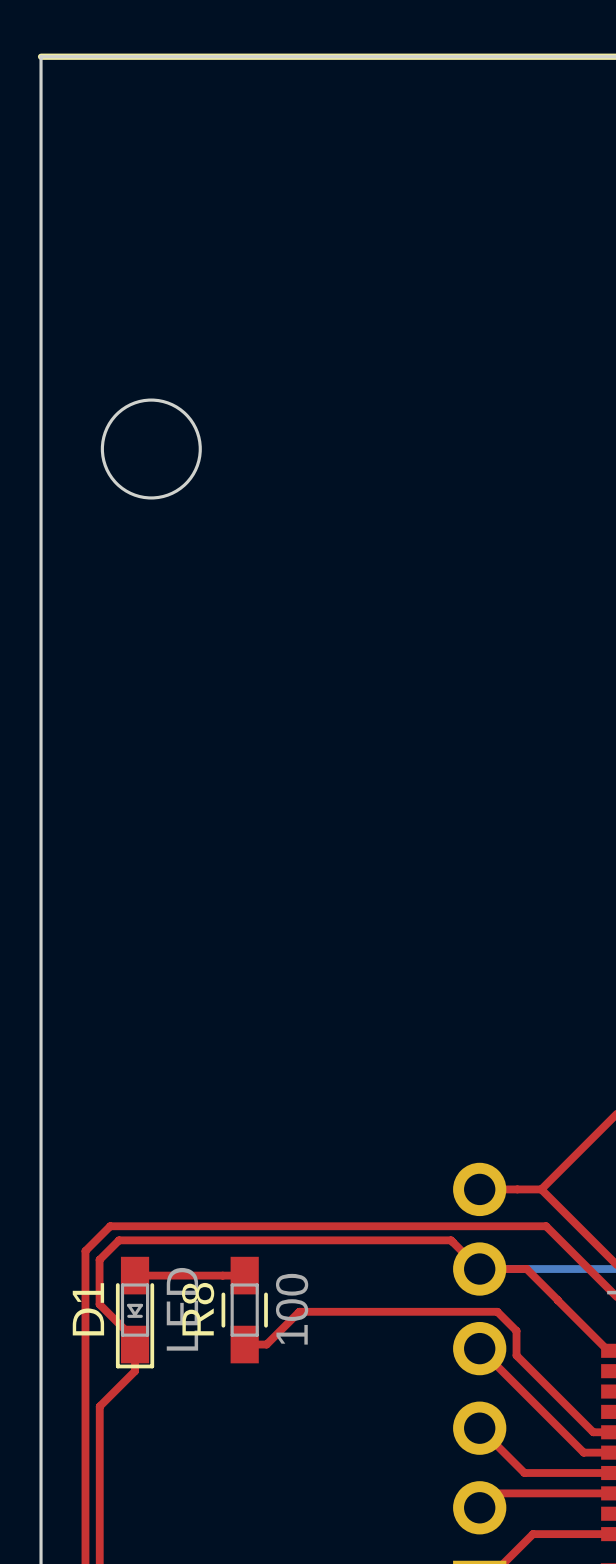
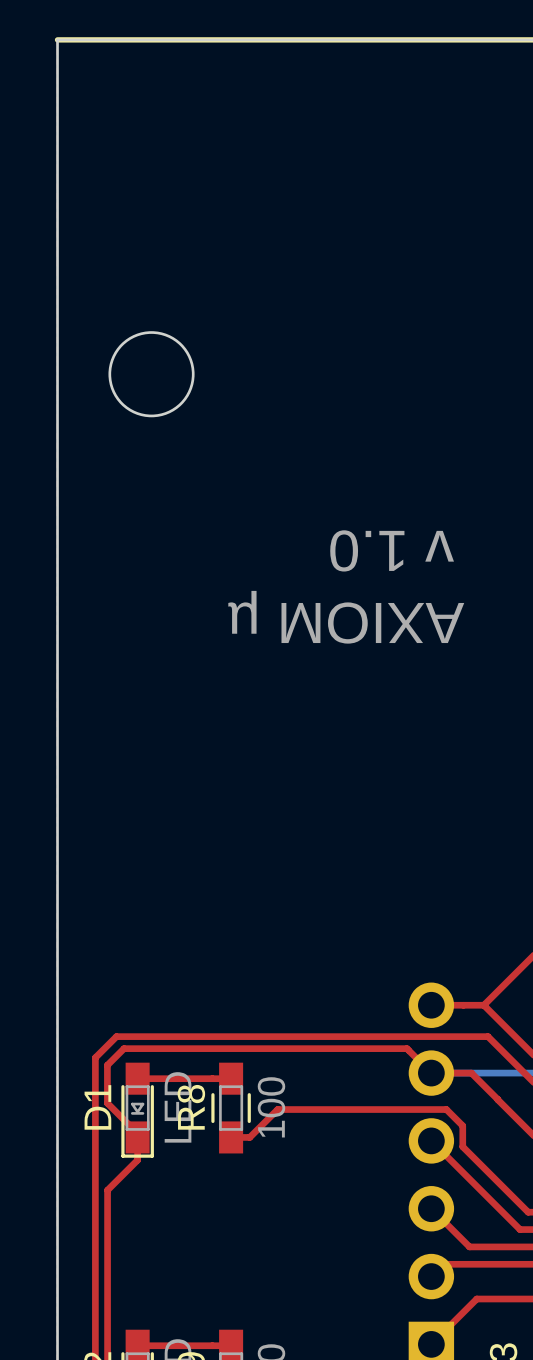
text: none -> v 1.0 (392, 550)
text: none -> AXIOM µ (346, 617)

